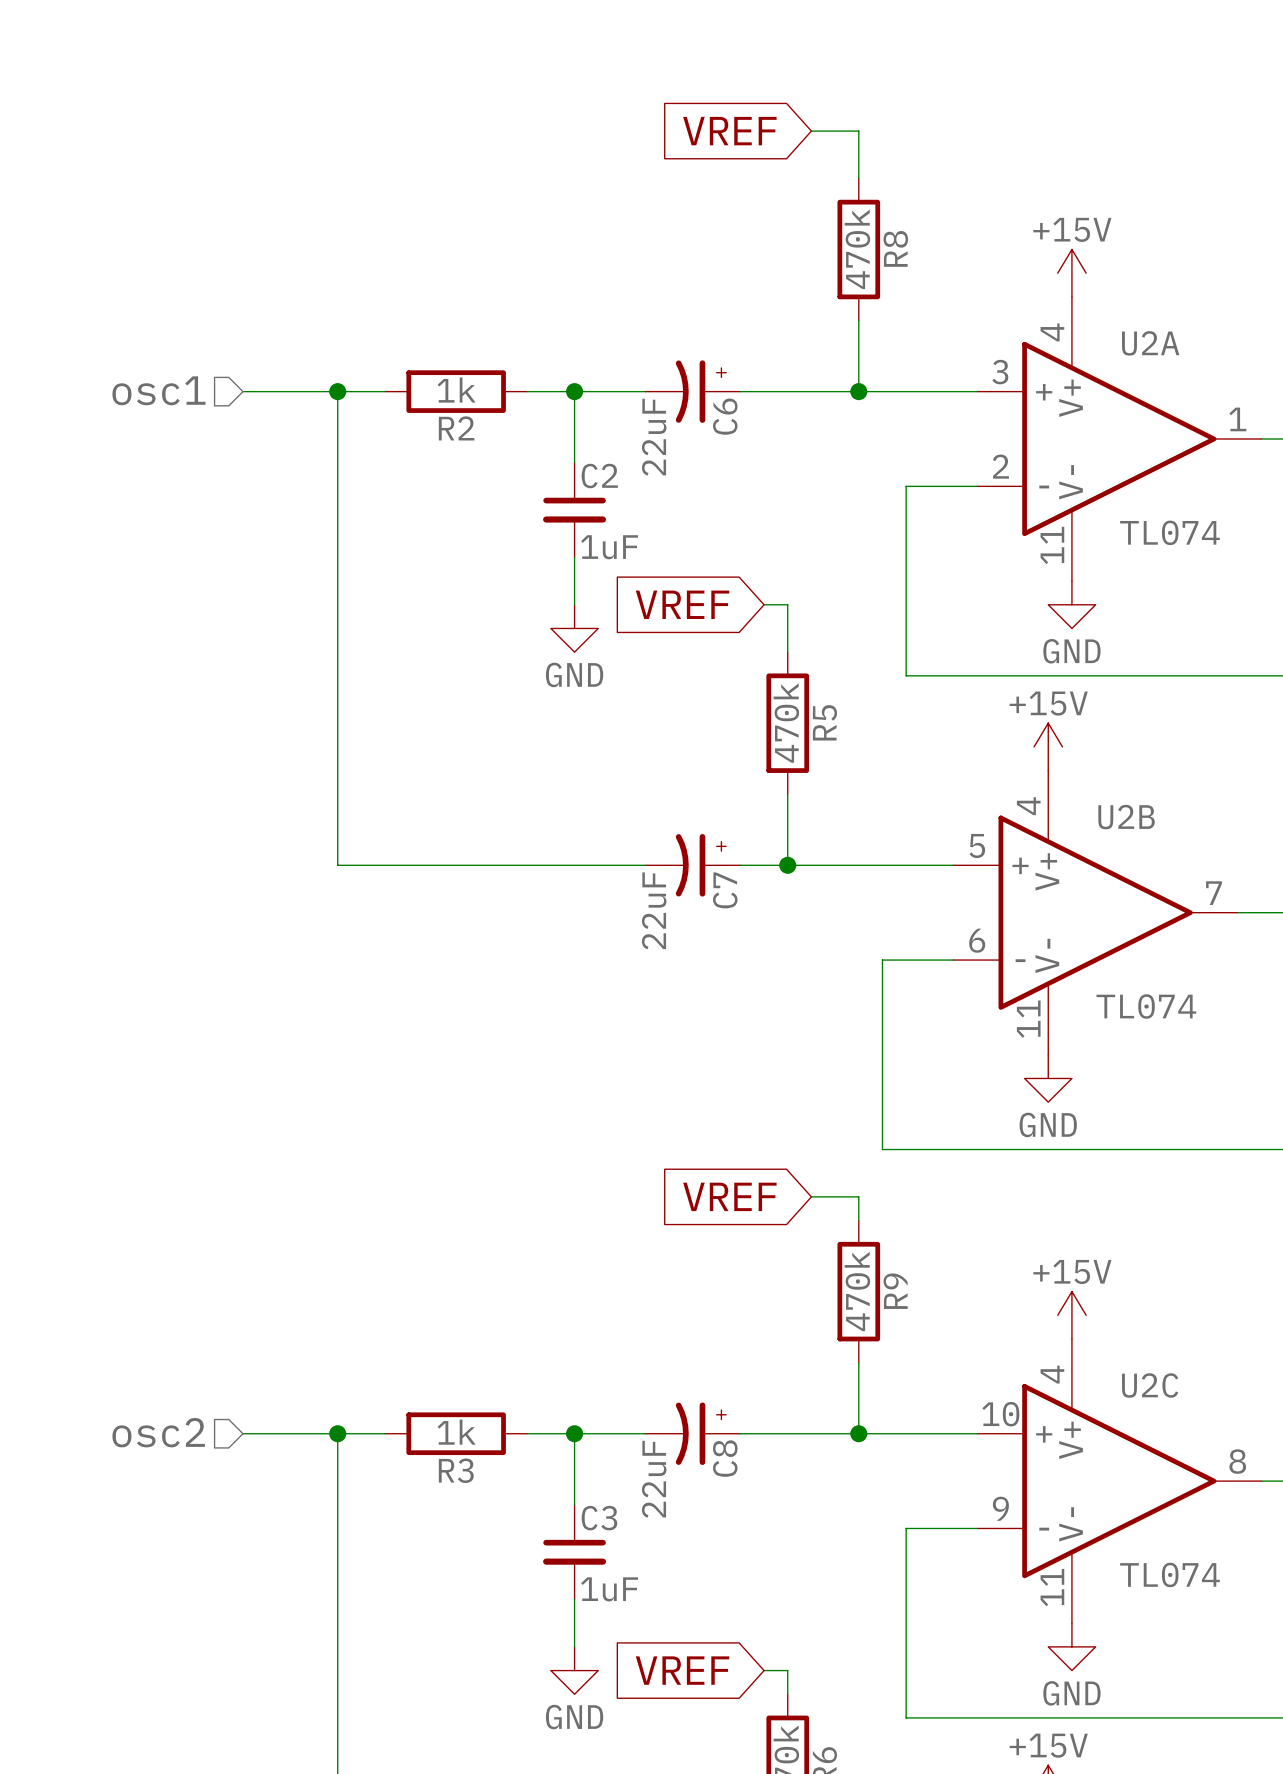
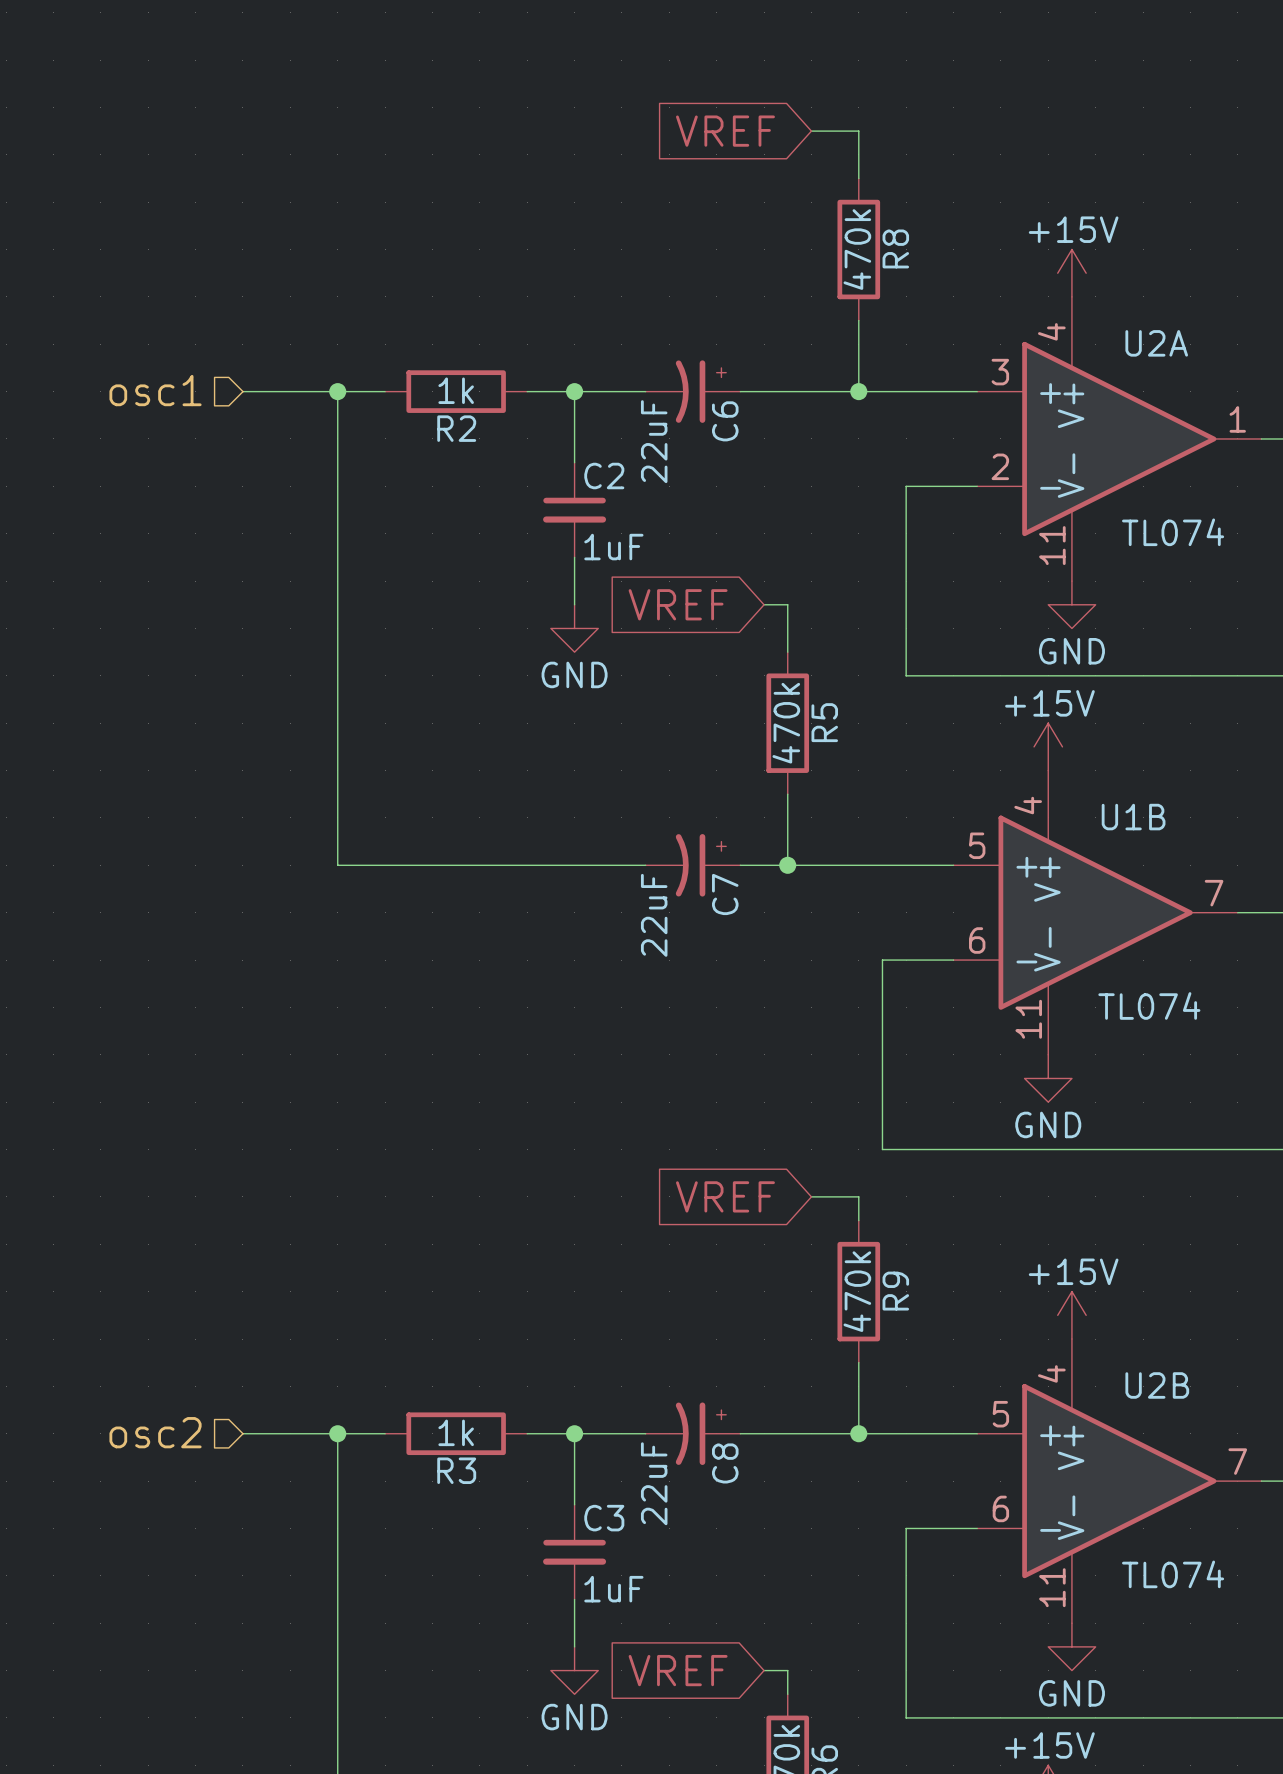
U2B name: U2B (1126, 817) -> U1B (1133, 817)
U2C name: U2C (1150, 1385) -> U2B (1157, 1385)
U2C pin number: 10 (1000, 1414) -> 5 (1000, 1414)
U2C pin number: 8 (1237, 1461) -> 7 (1237, 1461)
U2C pin number: 9 (1000, 1508) -> 6 (1000, 1508)

